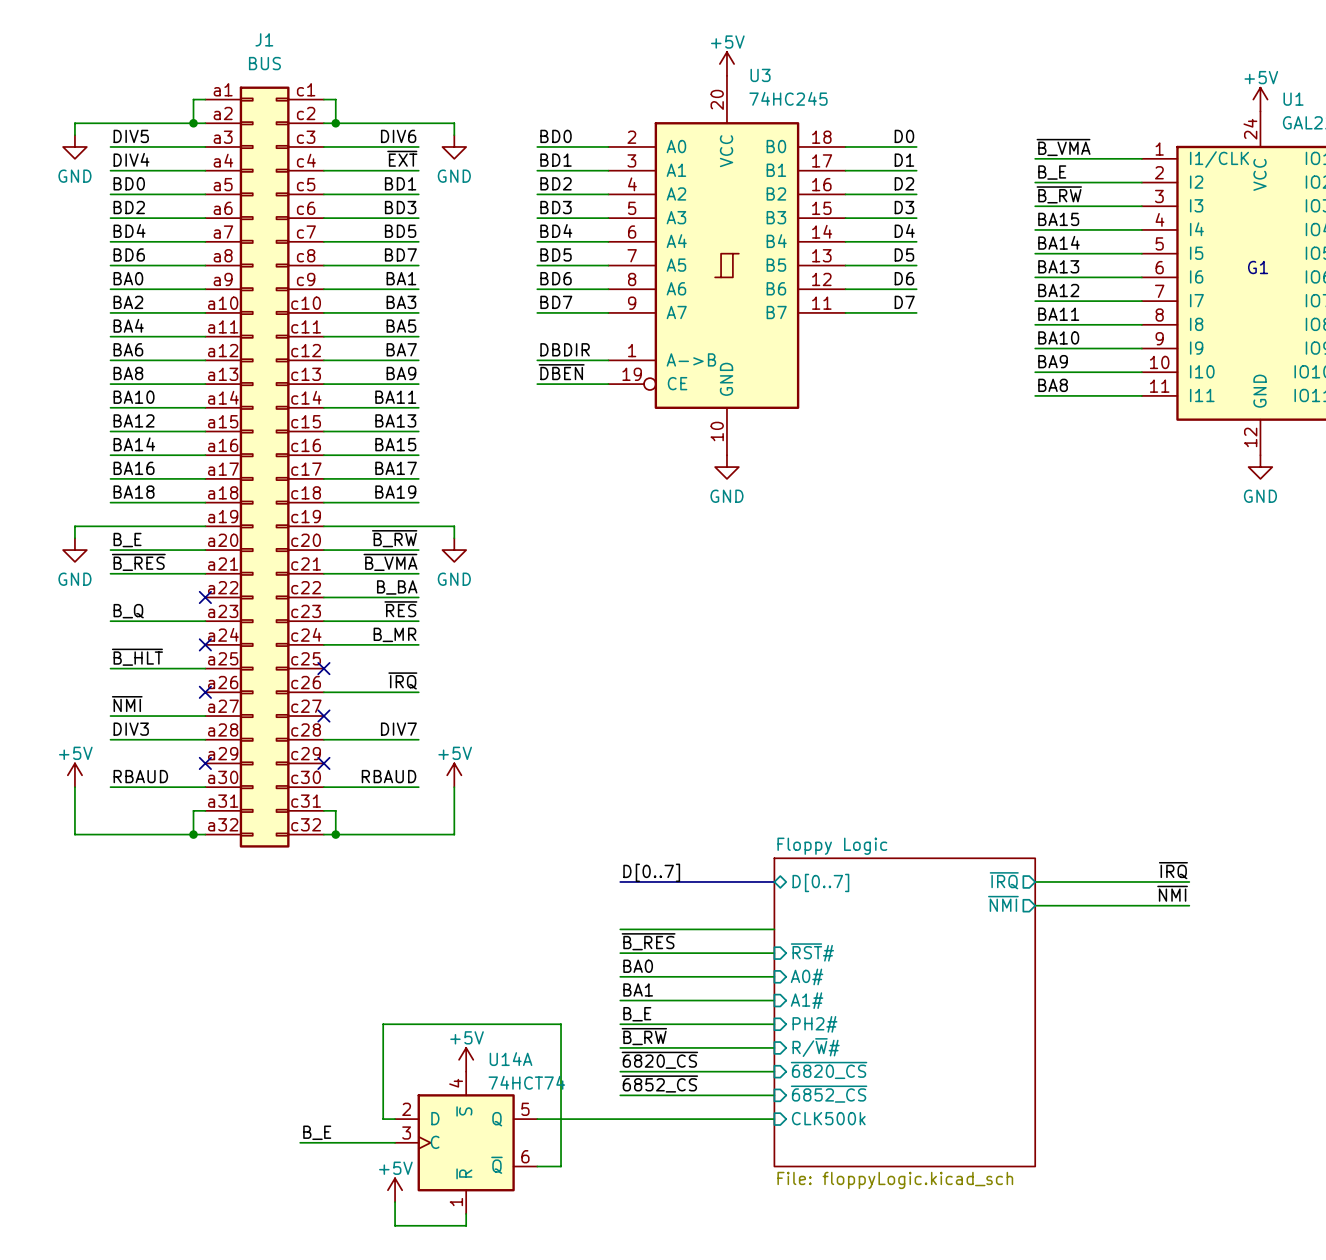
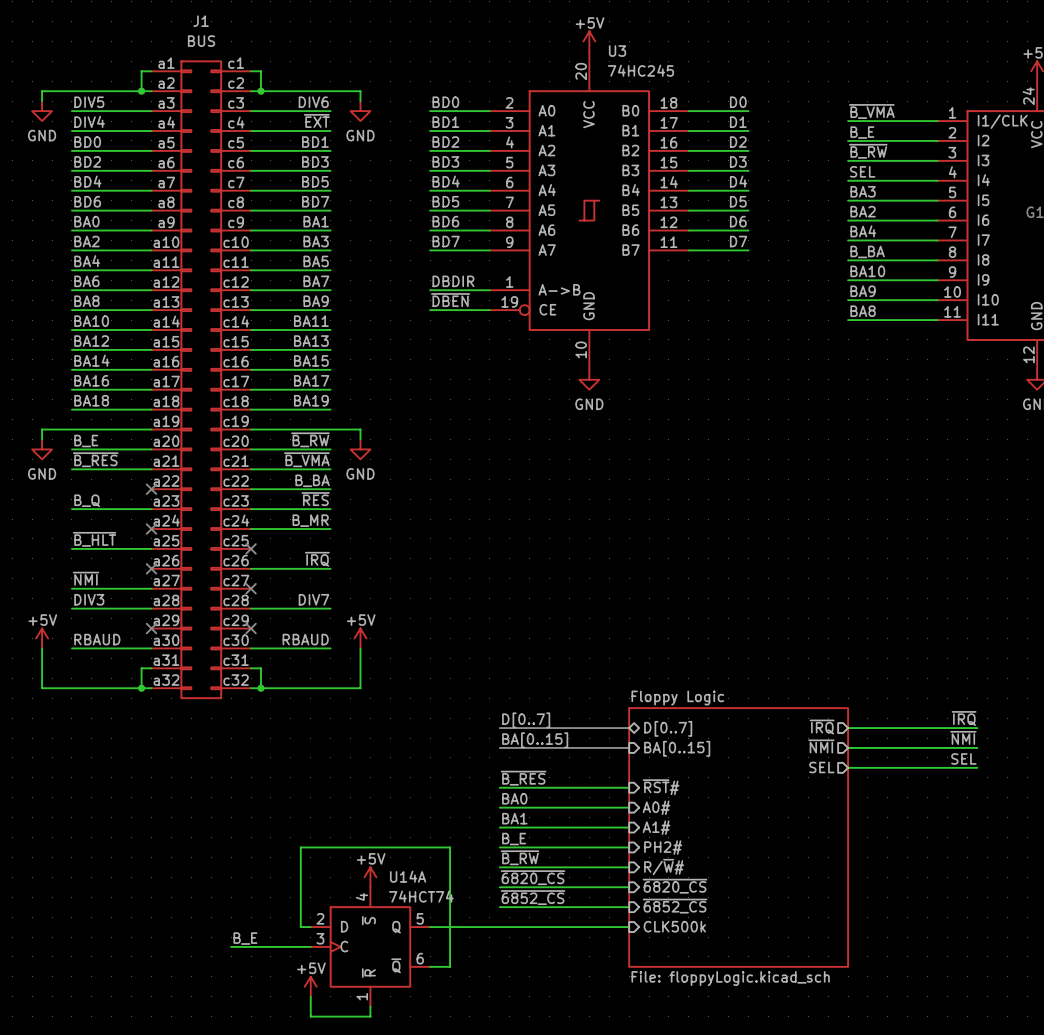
label: BA15 (1058, 219) -> SEL (862, 171)
label: BA14 (1059, 242) -> BA3 (863, 191)
label: BA13 (1058, 266) -> BA2 (863, 211)
label: BA12 (1058, 290) -> BA4 (863, 231)
label: BA11 (1058, 314) -> B_BA (867, 251)
label: none -> BA[0..15] (535, 740)
bus: none -> (499, 747) (629, 747)
sheet pin: none -> BA[0..15] (677, 748)
label: none -> SEL (963, 758)
sheet pin: none -> SEL (821, 767)
wire: (620, 929) (774, 929) -> none
wire: none -> (848, 767) (977, 767)

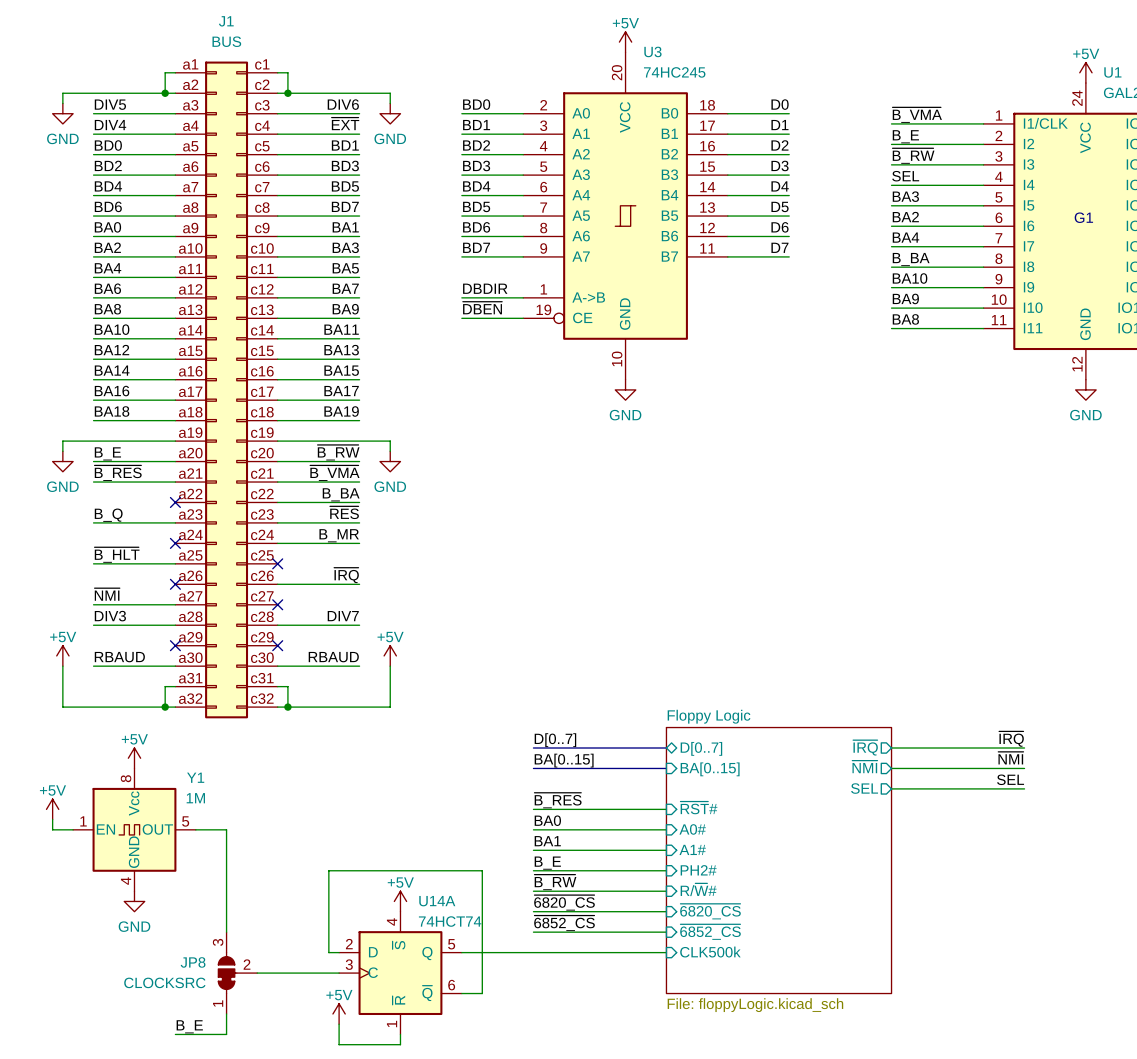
power symbol: none -> +5V (134, 758)
power symbol: none -> +5V (52, 809)
wire: none -> (52, 819) (52, 829) (73, 829)
Y1: none -> 1M (134, 829)
wire: none -> (195, 829) (226, 829) (226, 932)
power symbol: none -> GND (134, 901)
label position: B_E (245, 938) -> B_E (189, 1026)
JP8: none -> CLOCKSRC (237, 973)
wire: none -> (226, 1013) (226, 1034) (175, 1034)

